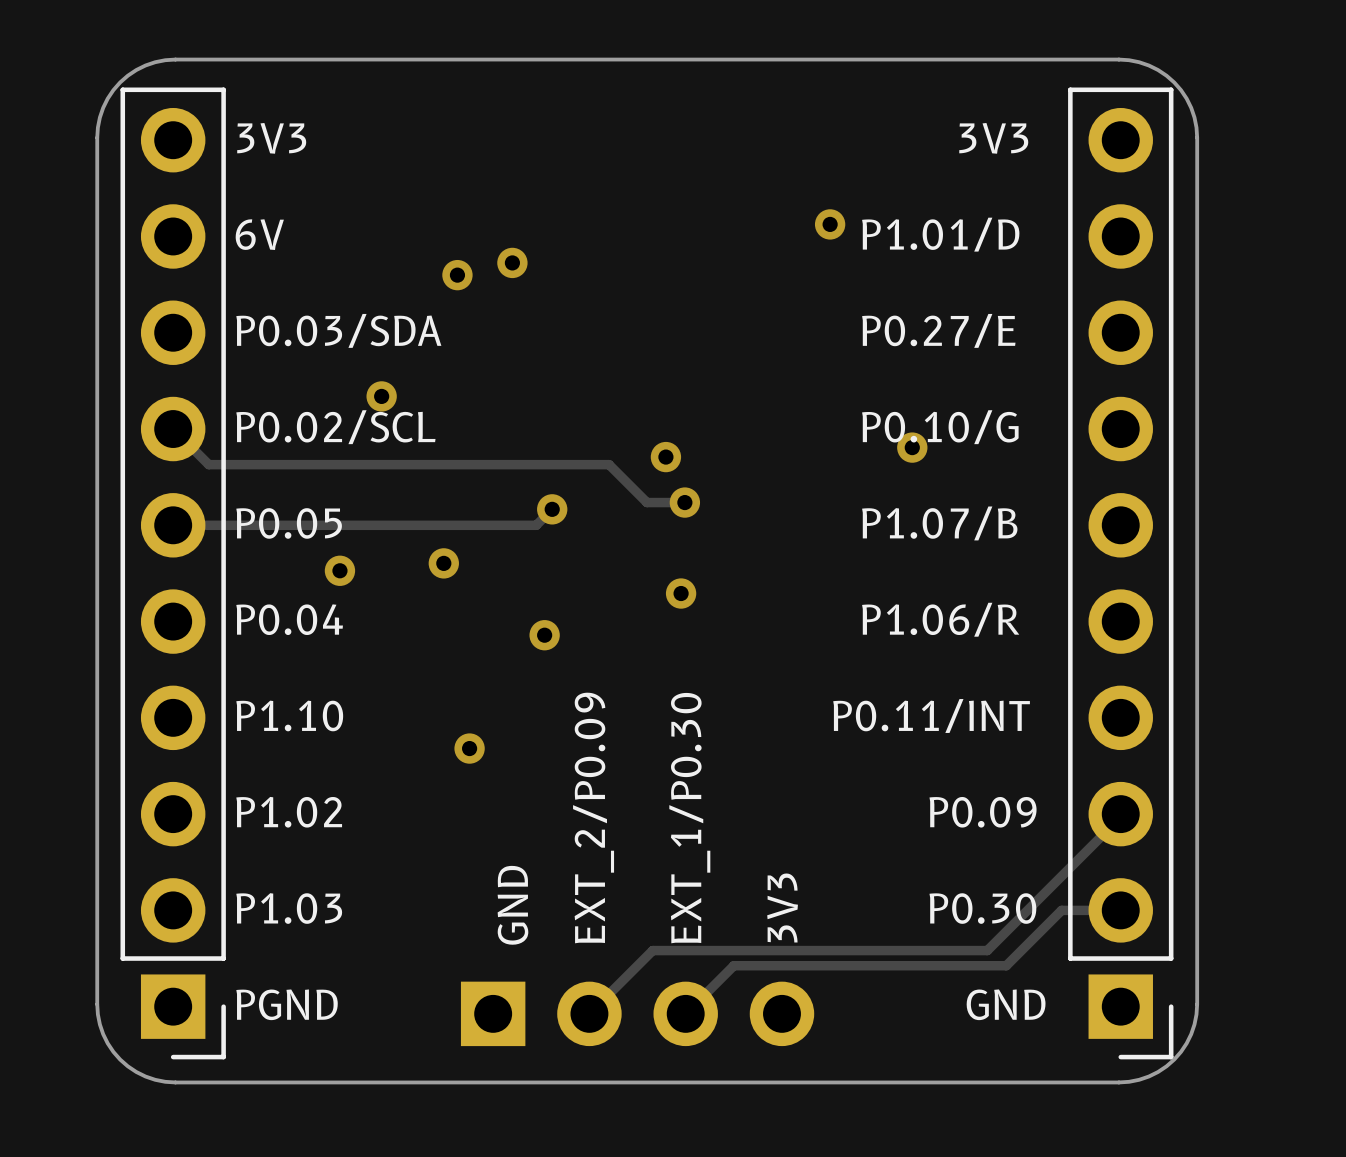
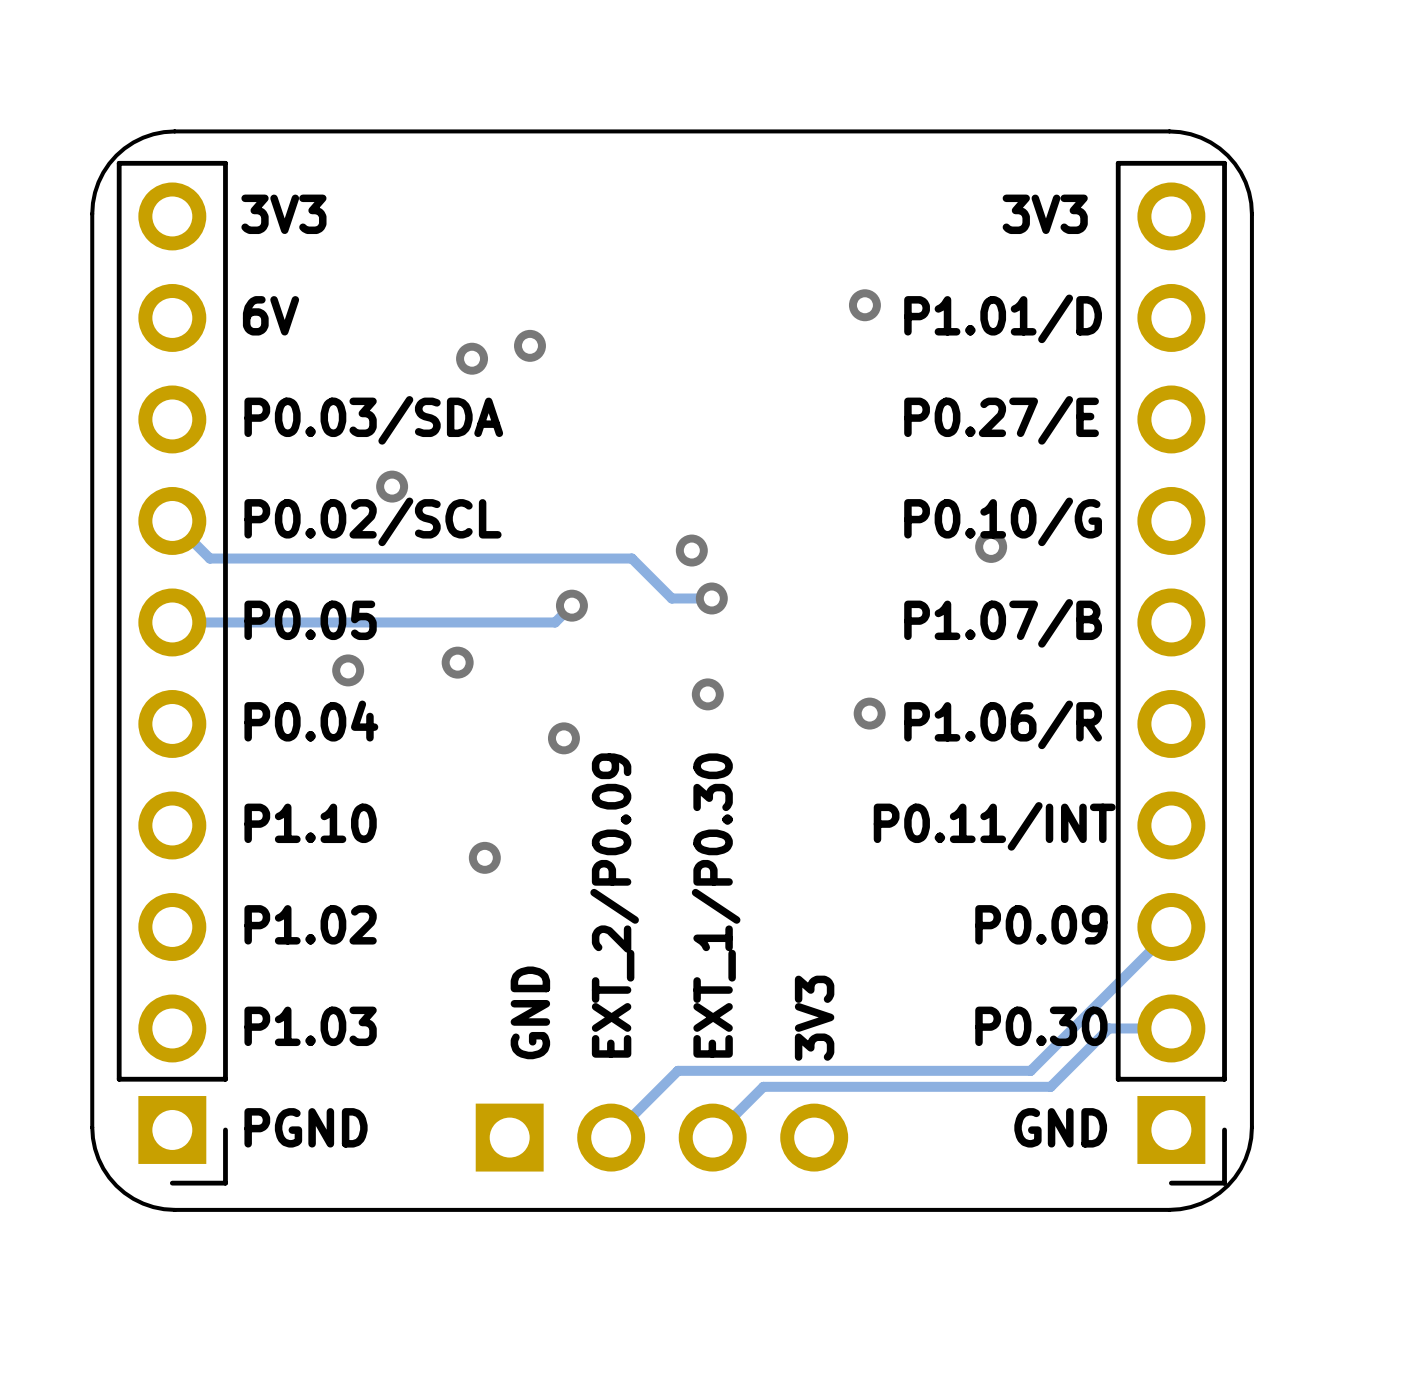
via position: (912, 447) -> (991, 546)
via: none -> (869, 713)

